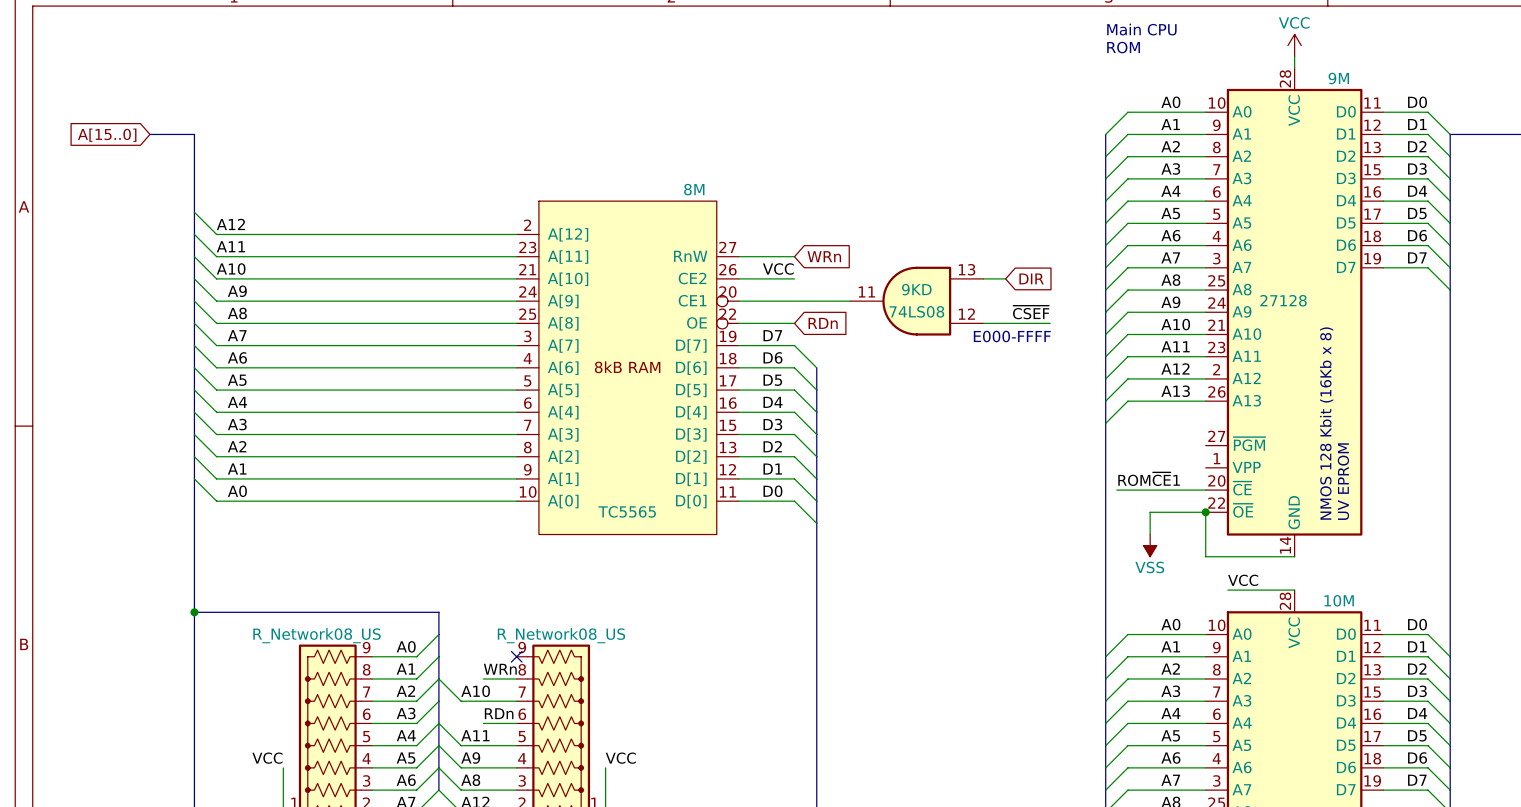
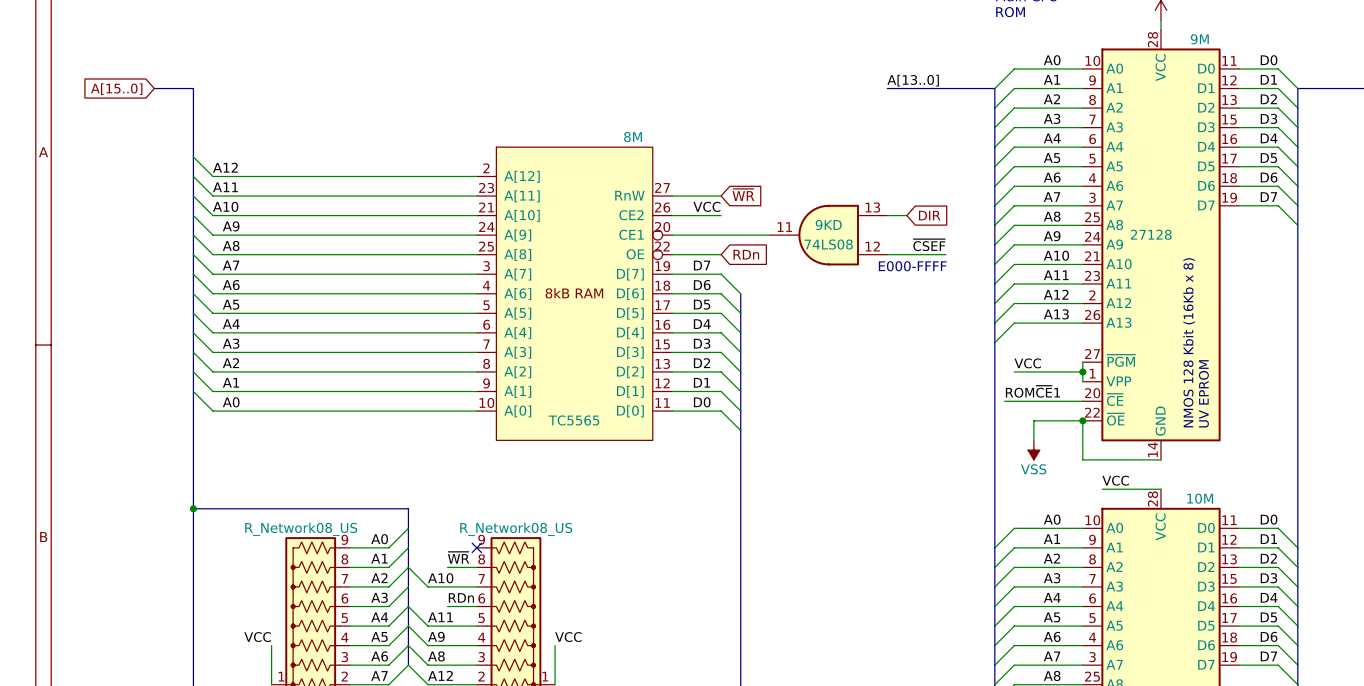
label: none -> A[13..0] (913, 80)
bus: none -> (887, 88) (994, 88)
global label: WRn (824, 256) -> ~{WR} (743, 194)
wire: none -> (1082, 362) (1082, 381)
label: none -> VCC (1027, 363)
wire: none -> (1014, 371) (1082, 371)
junction: none -> (1082, 371)
label: WRn (500, 669) -> ~{WR} (458, 557)

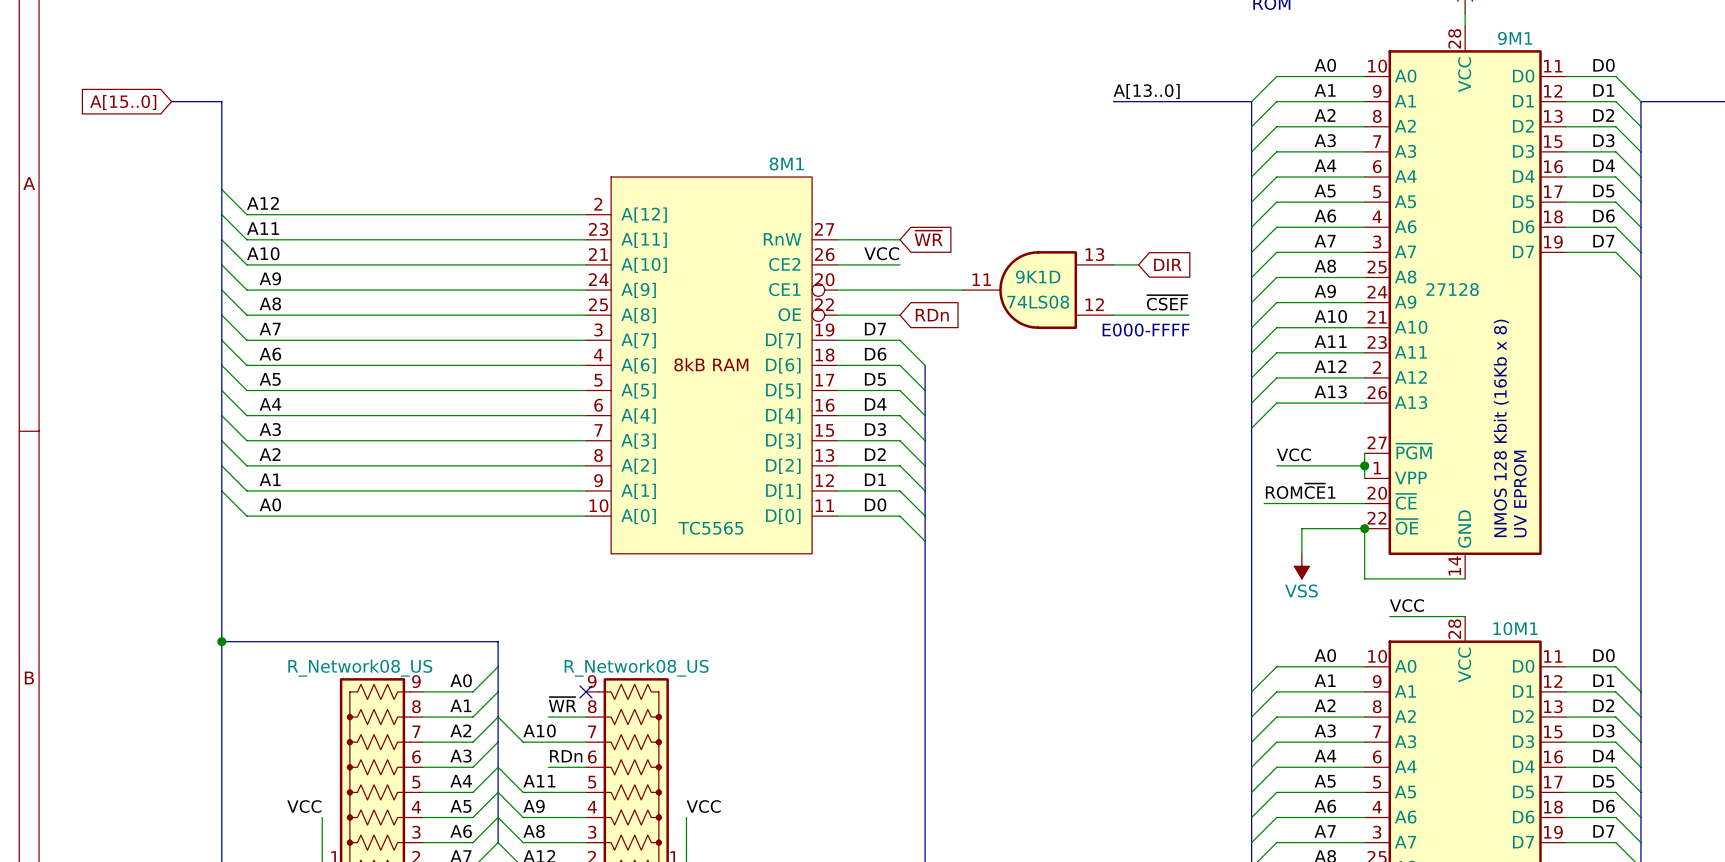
9M name: 9M (1199, 39) -> 9M1 (1515, 38)
8M name: 8M (633, 137) -> 8M1 (786, 163)
9KD name: 9KD (828, 224) -> 9K1D (1038, 277)
10M name: 10M (1200, 498) -> 10M1 (1515, 628)

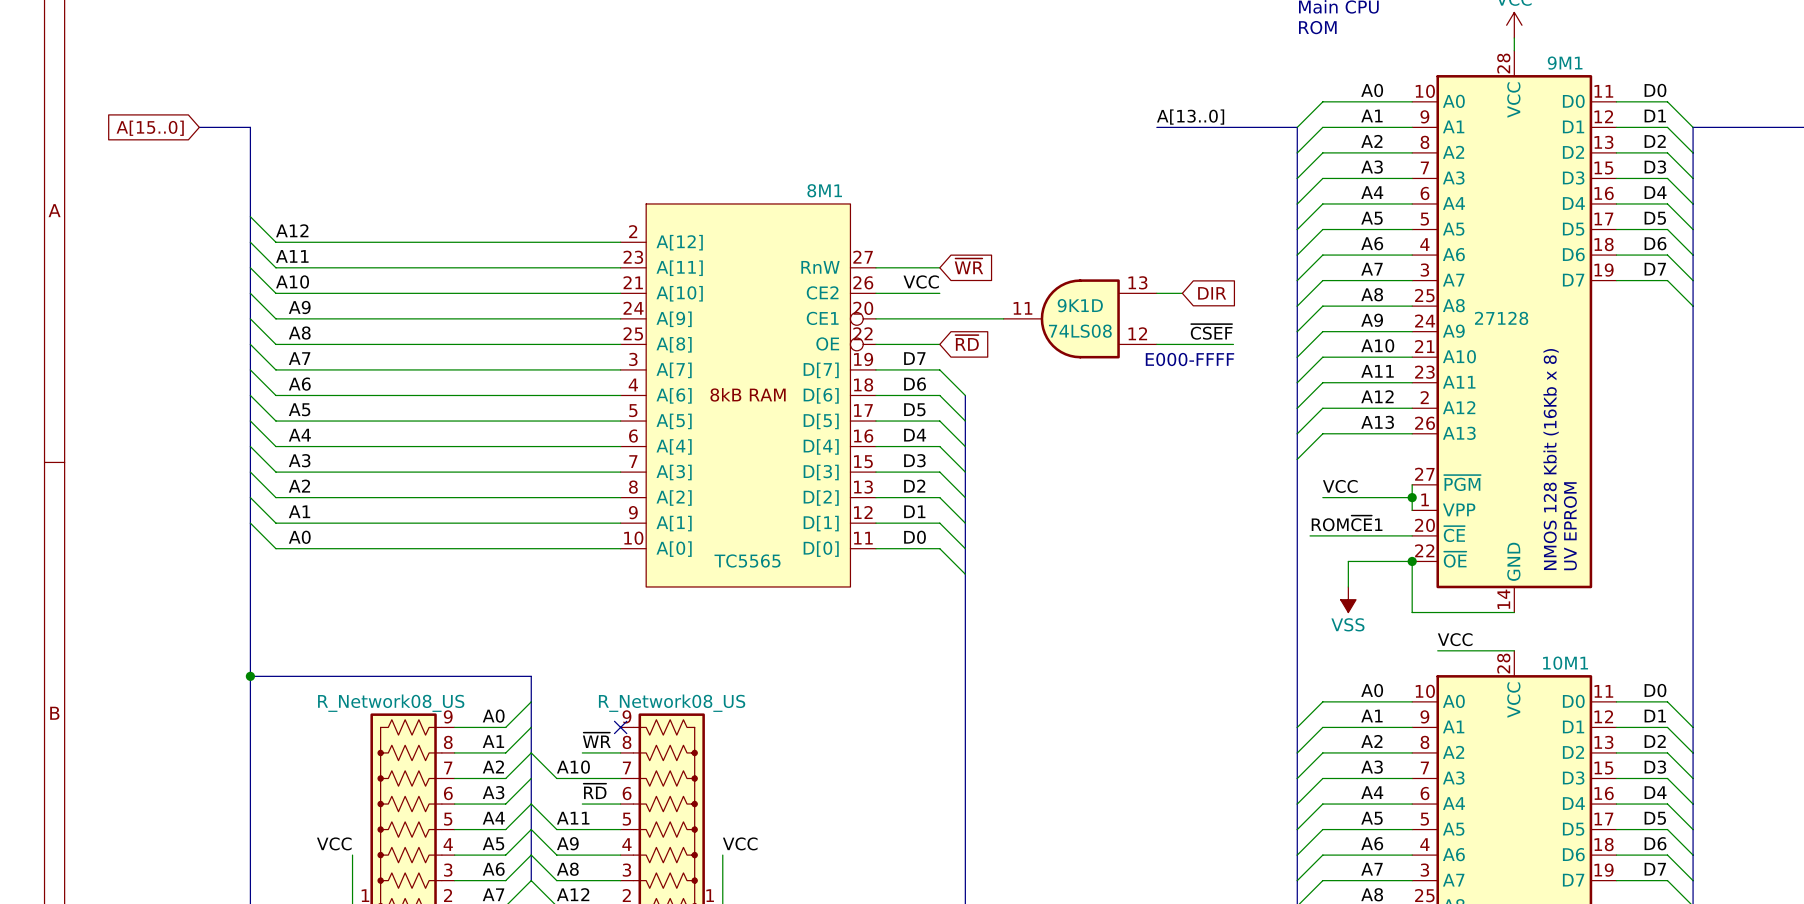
global label: RDn (932, 315) -> ~{RD} (967, 342)
label: RDn (566, 756) -> ~{RD} (595, 791)

